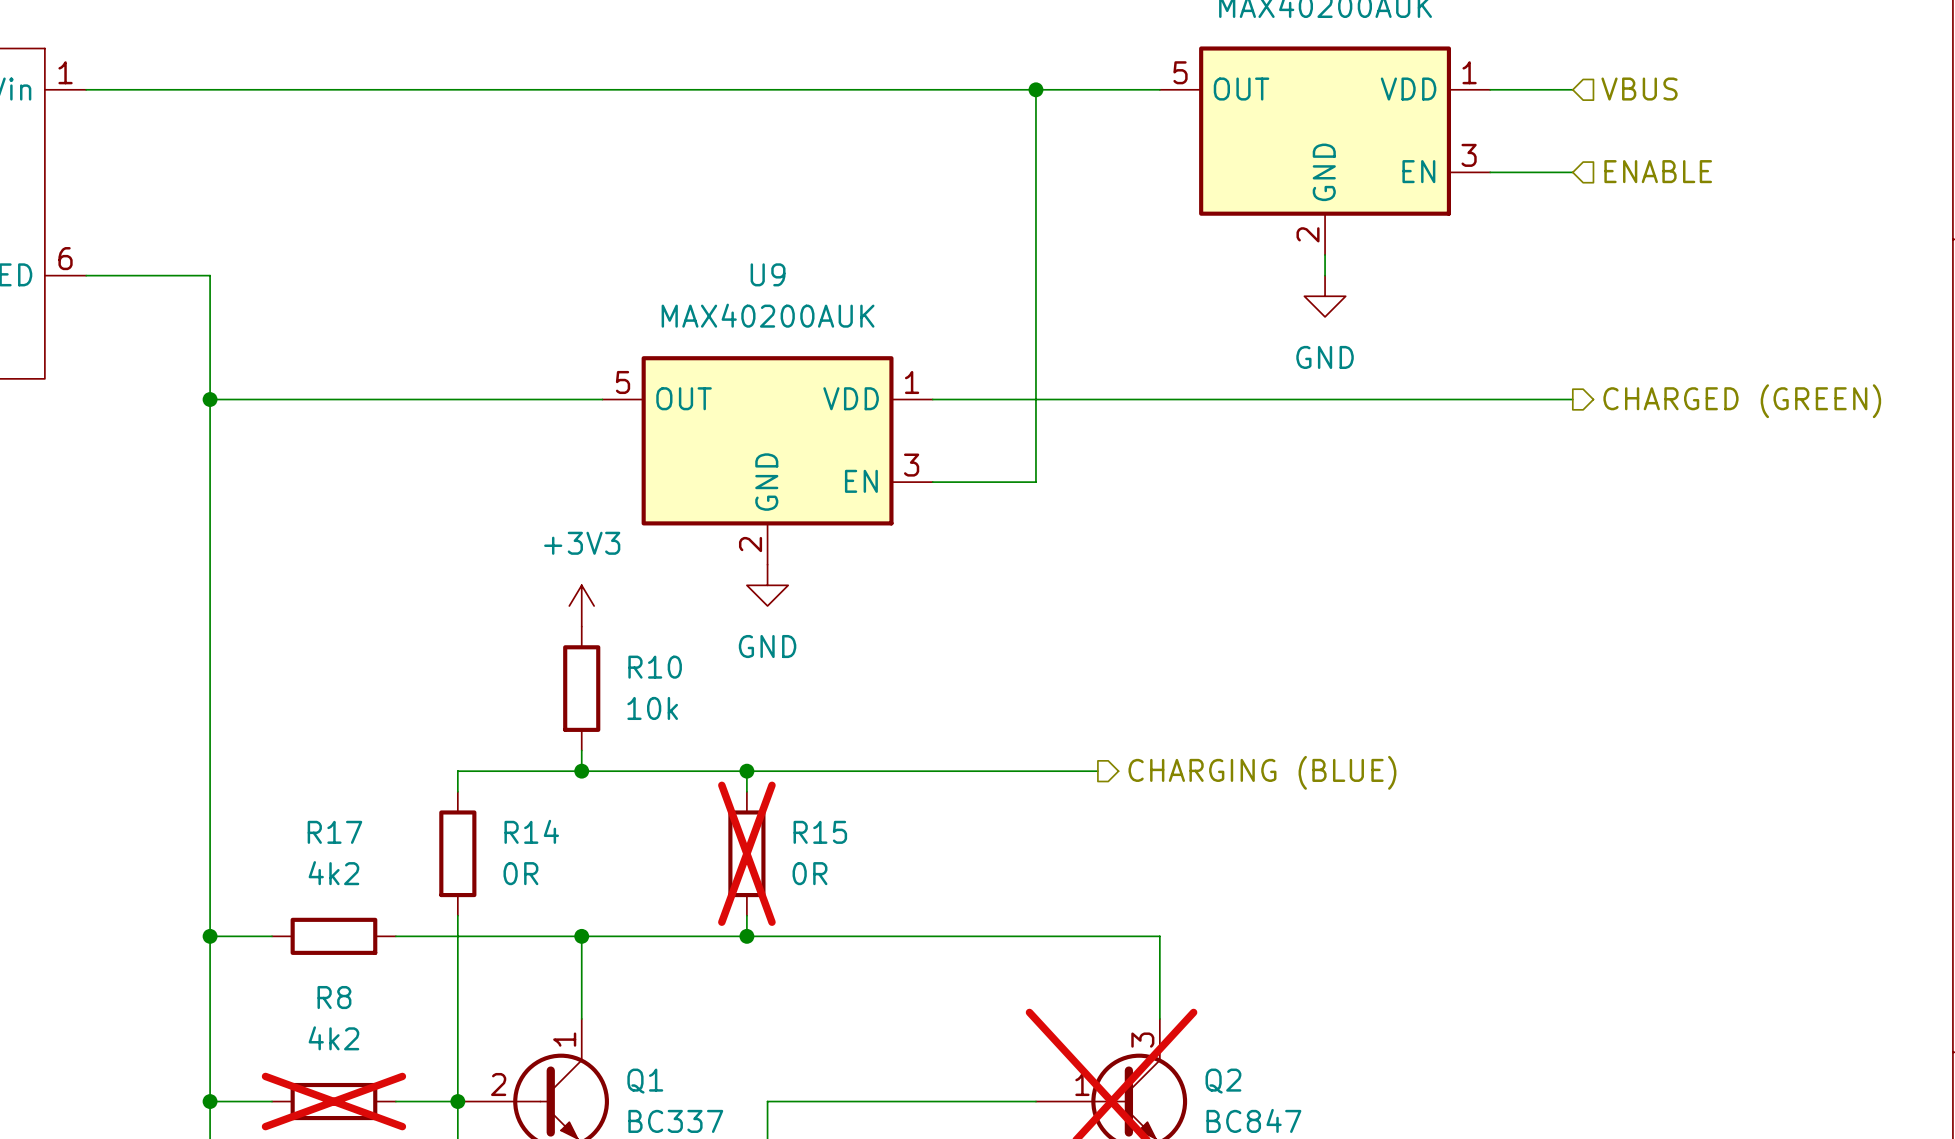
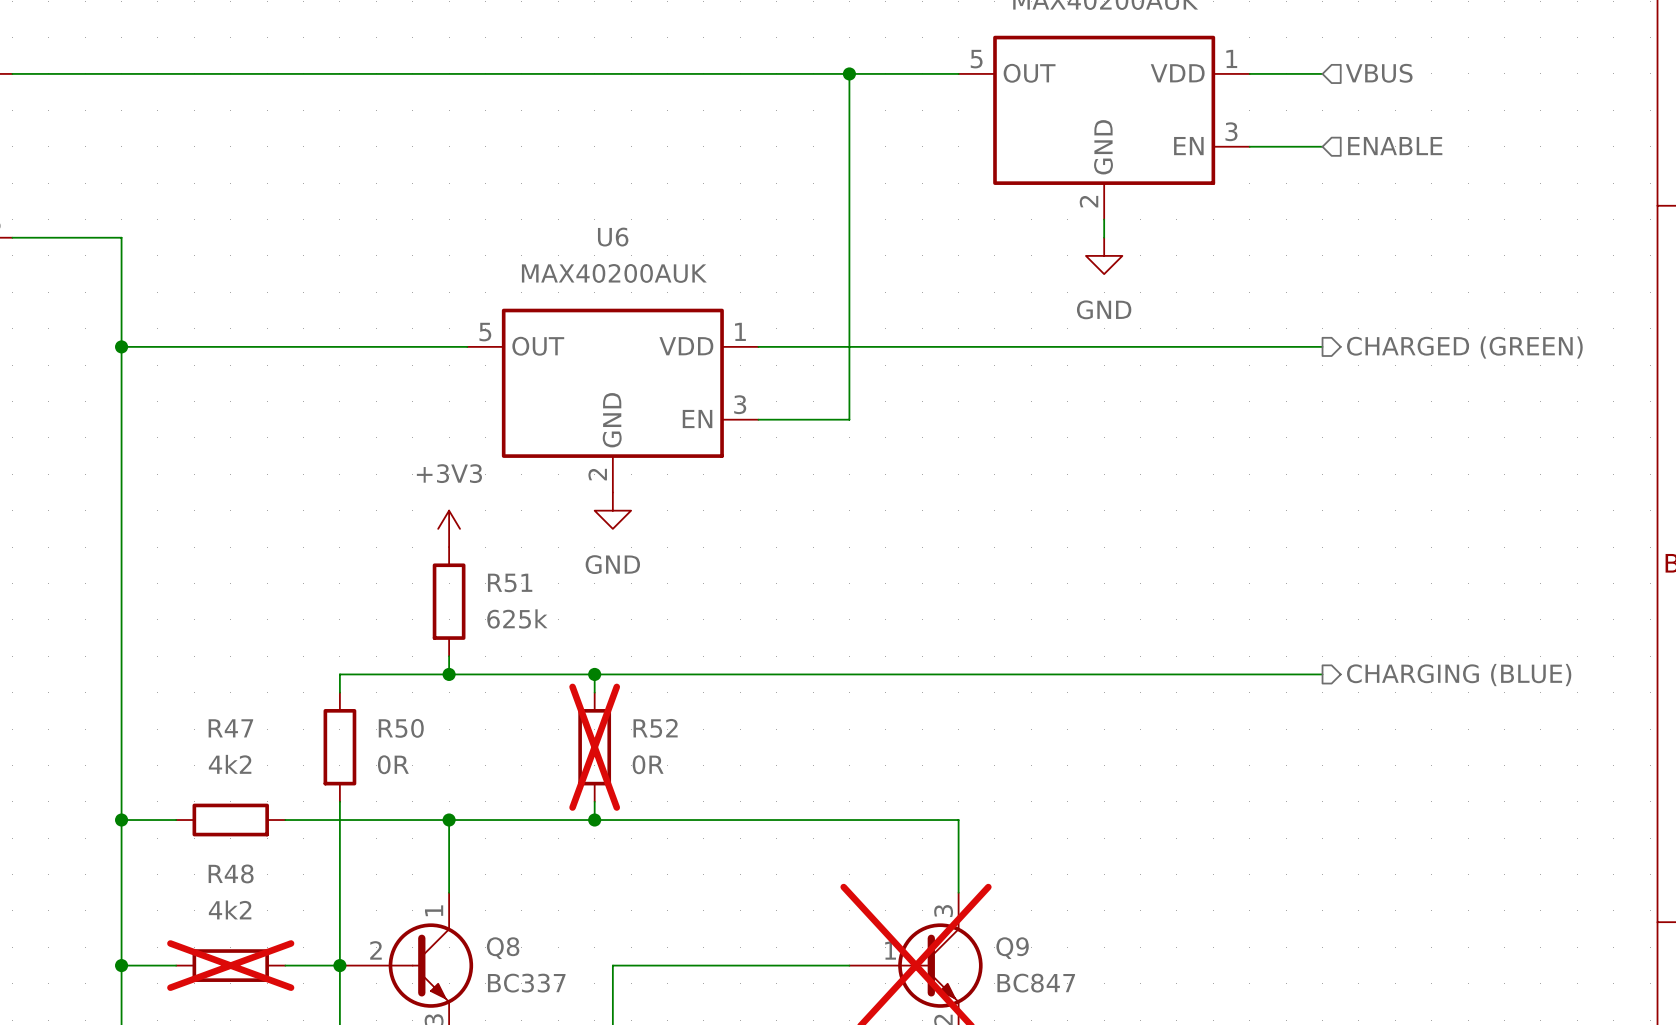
U9 name: U9 (768, 274) -> U6 (613, 237)
R10 name: R10 (655, 667) -> R51 (510, 582)
R10 value: 10k (652, 708) -> 625k (517, 618)
wire: none -> (904, 674) (1322, 674)
hierarchical label: CHARGING (BLUE) (1262, 772) -> none
hierarchical label: none -> CHARGING (BLUE) (1459, 675)
R14 name: R14 (531, 831) -> R50 (401, 728)
R17 name: R17 (334, 832) -> R47 (230, 728)
R15 name: R15 (820, 832) -> R52 (655, 728)
R8 name: R8 (334, 997) -> R48 (231, 873)
Q1 name: Q1 (645, 1081) -> Q8 (503, 948)
Q2 name: Q2 (1223, 1081) -> Q9 (1012, 948)

